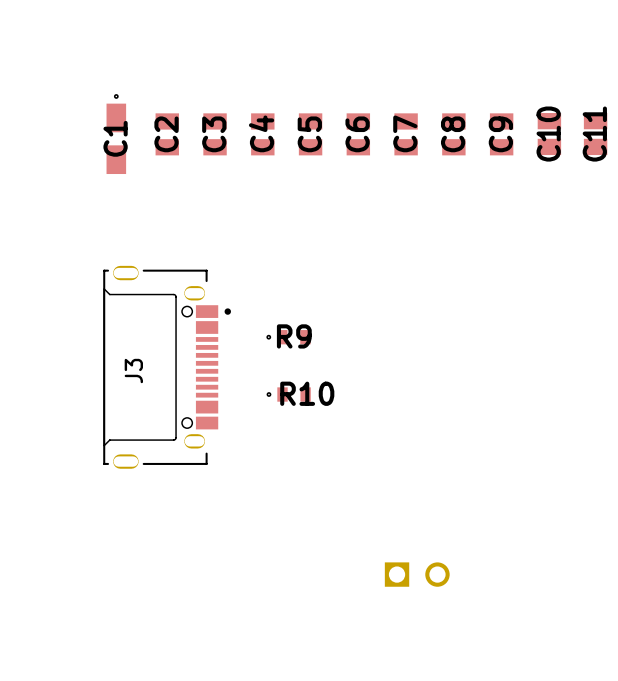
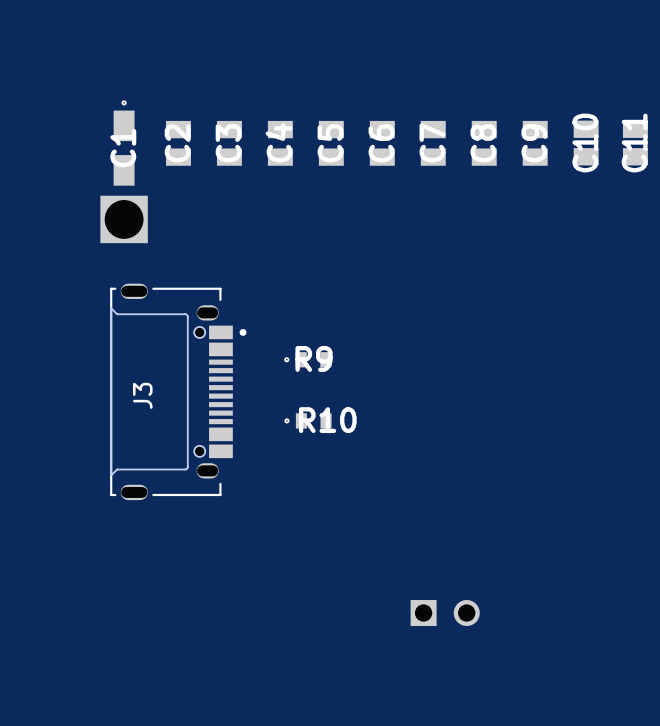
part: none -> (124, 219)

